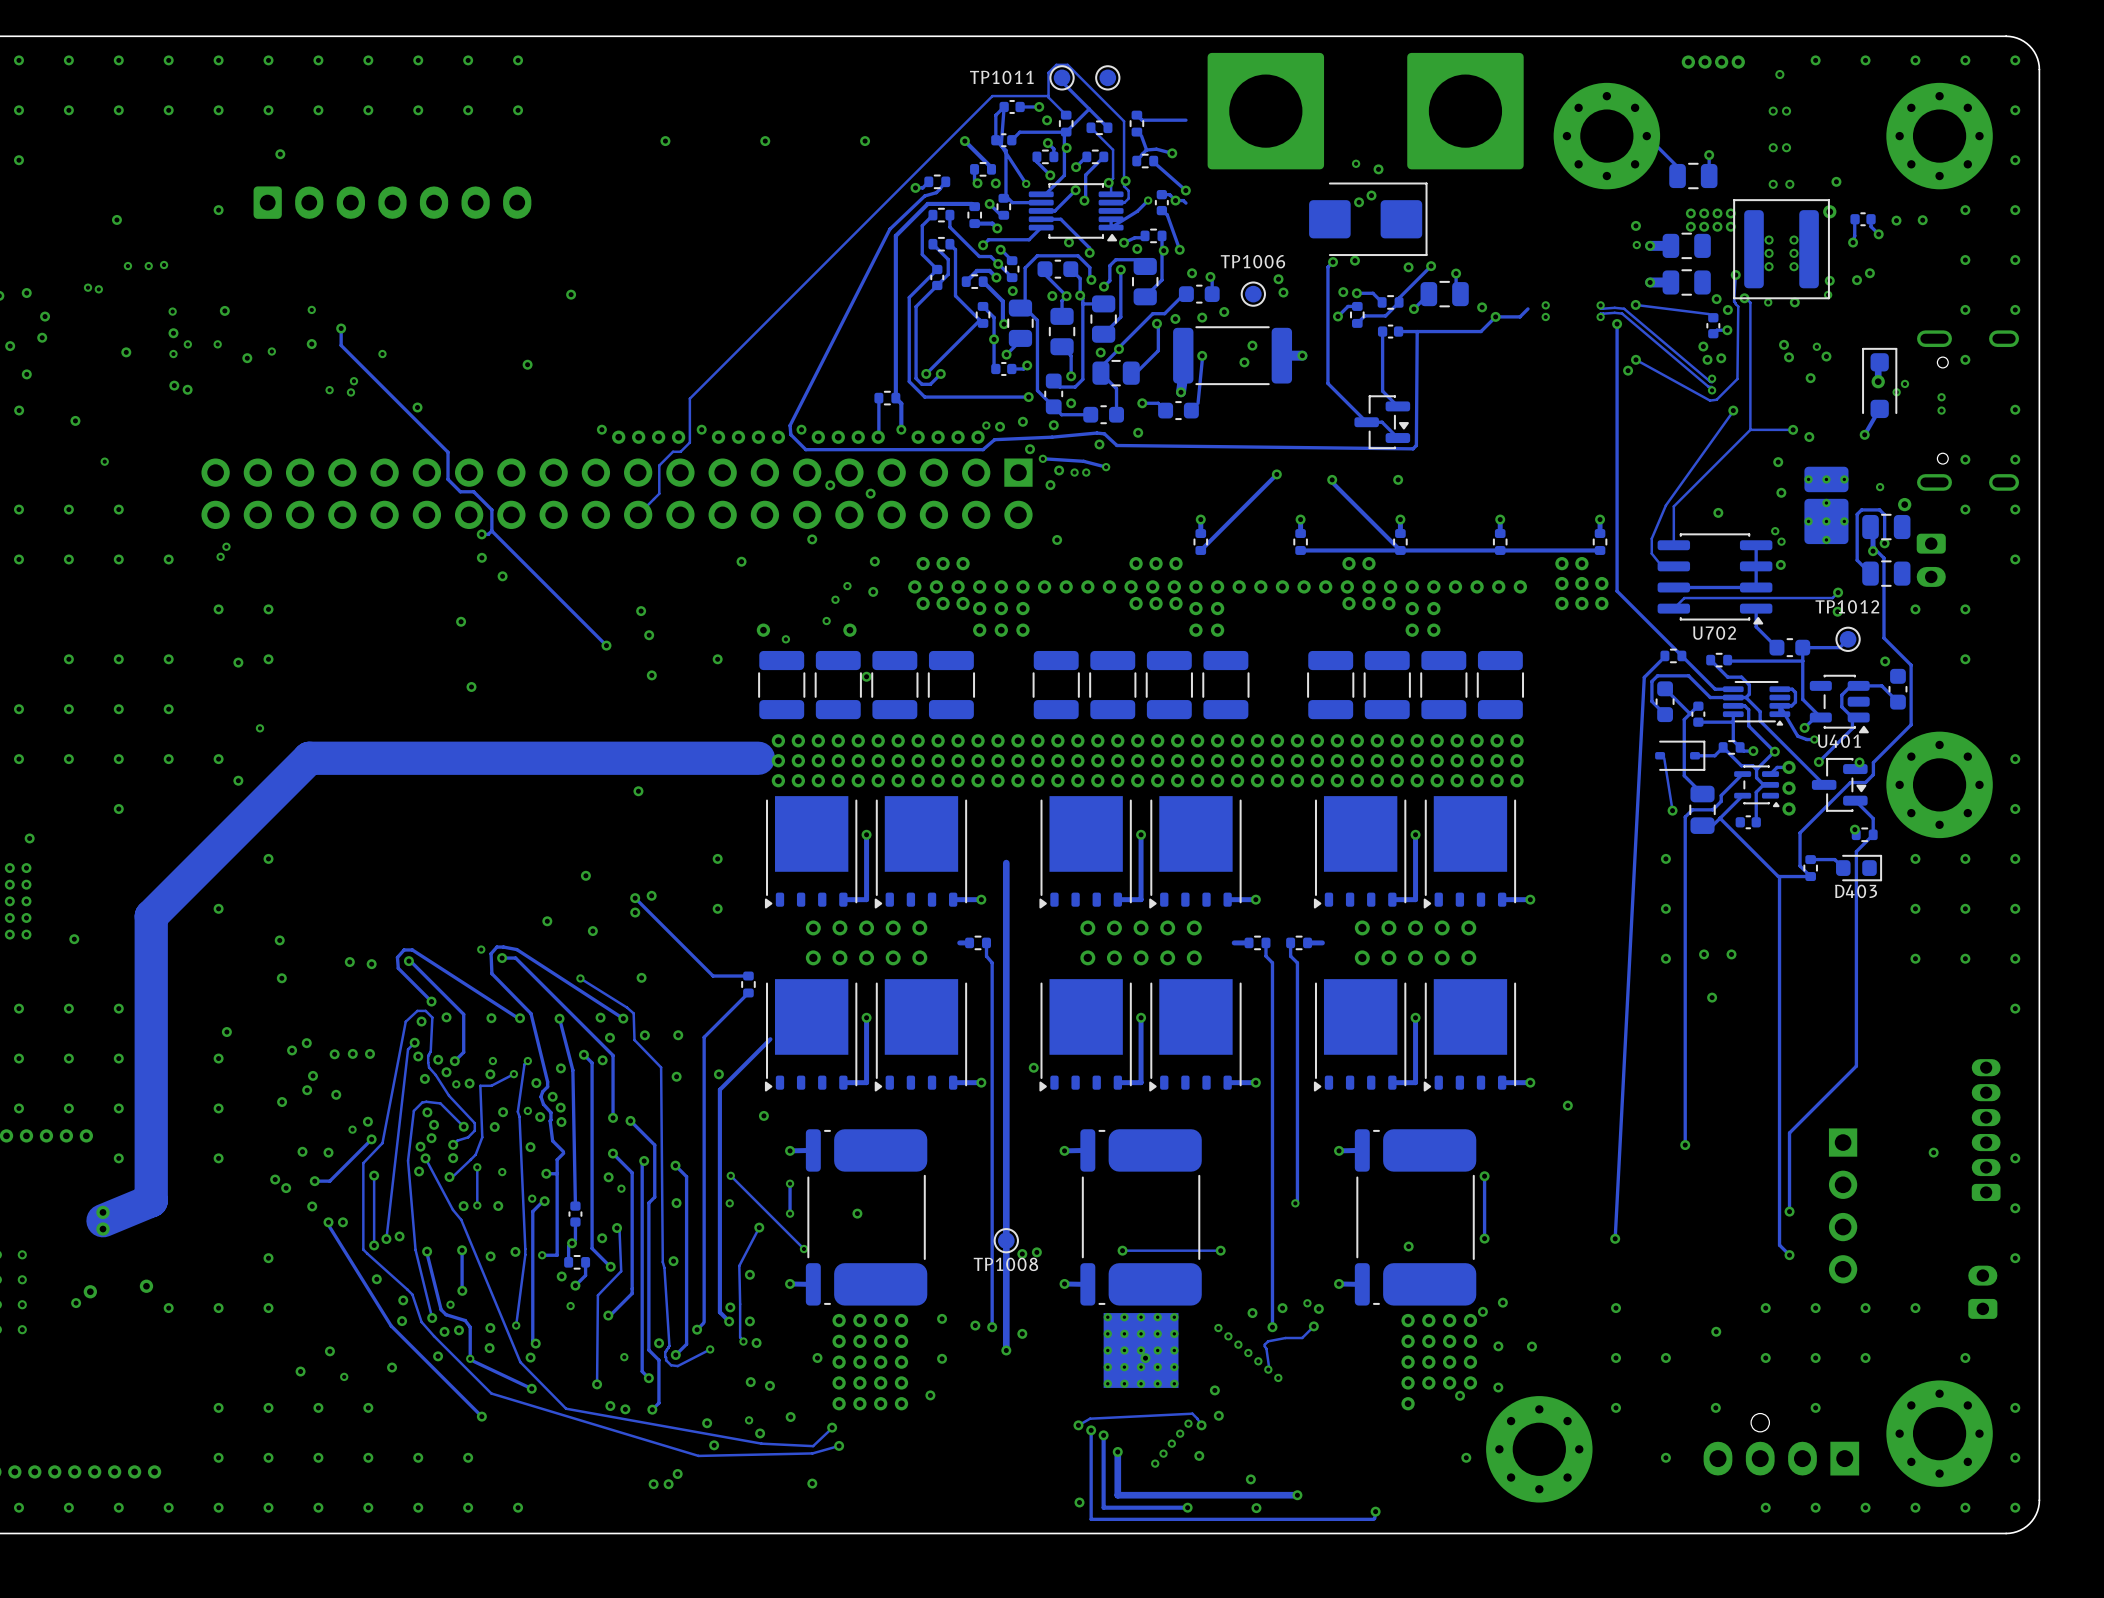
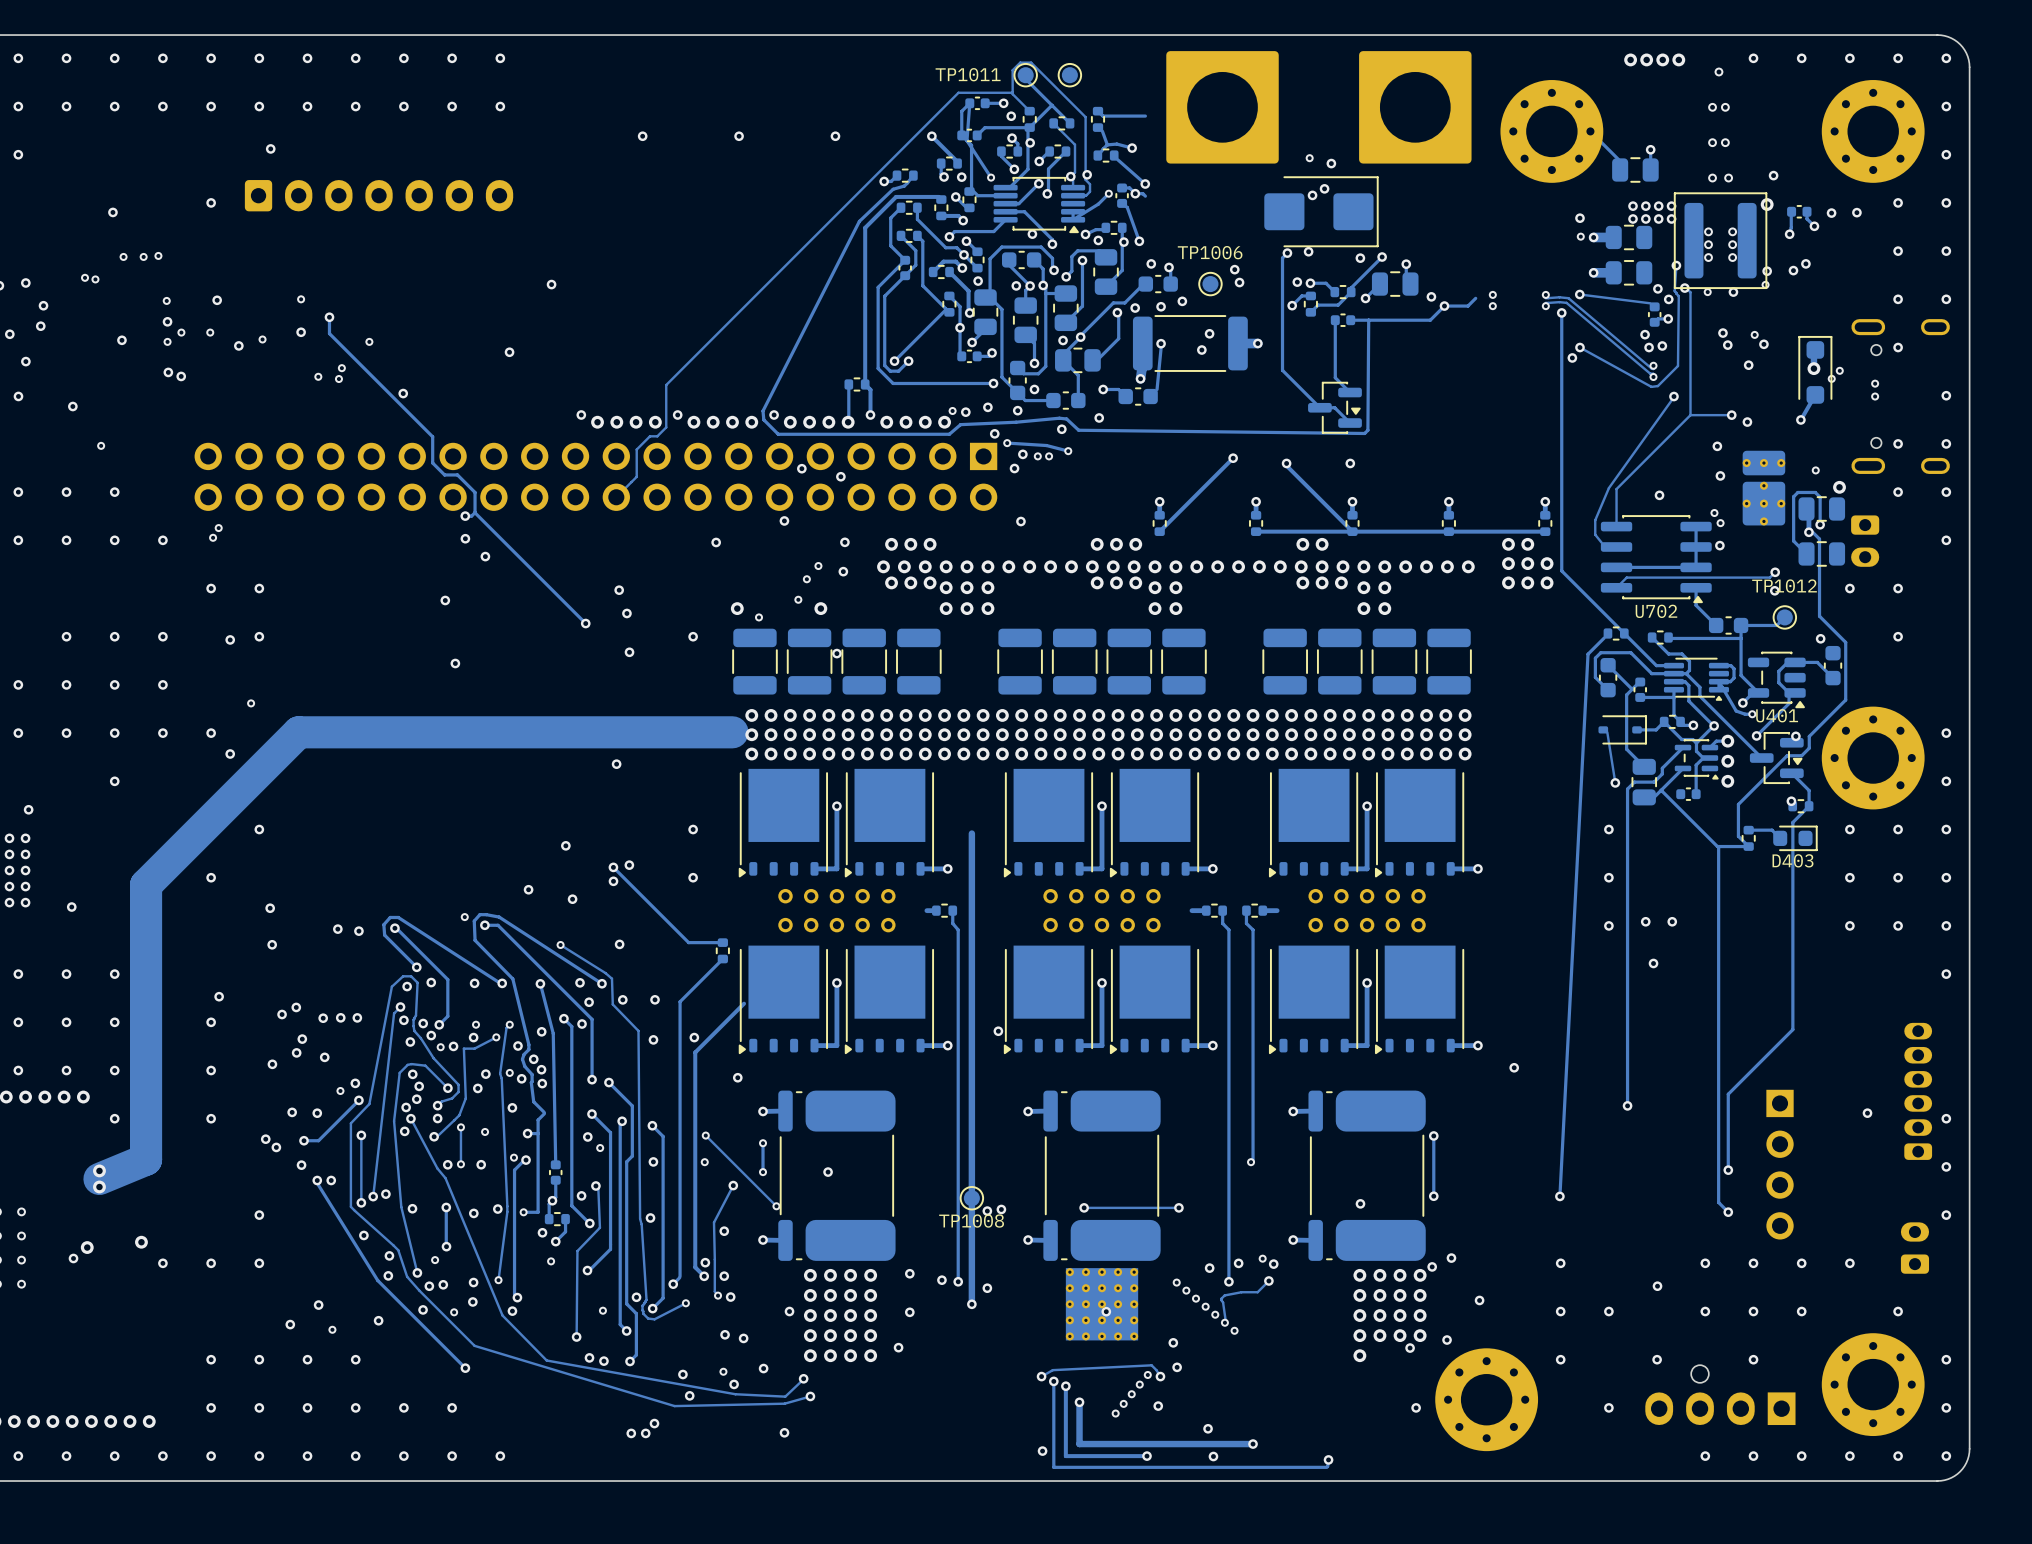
track: (427, 1256) (441, 1309) (446, 1314) (465, 1320) (470, 1327) (470, 1354) -> none
via: (1498, 1346) -> none
track: (473, 1361) (531, 1388) -> none
via: (531, 1388) -> none

